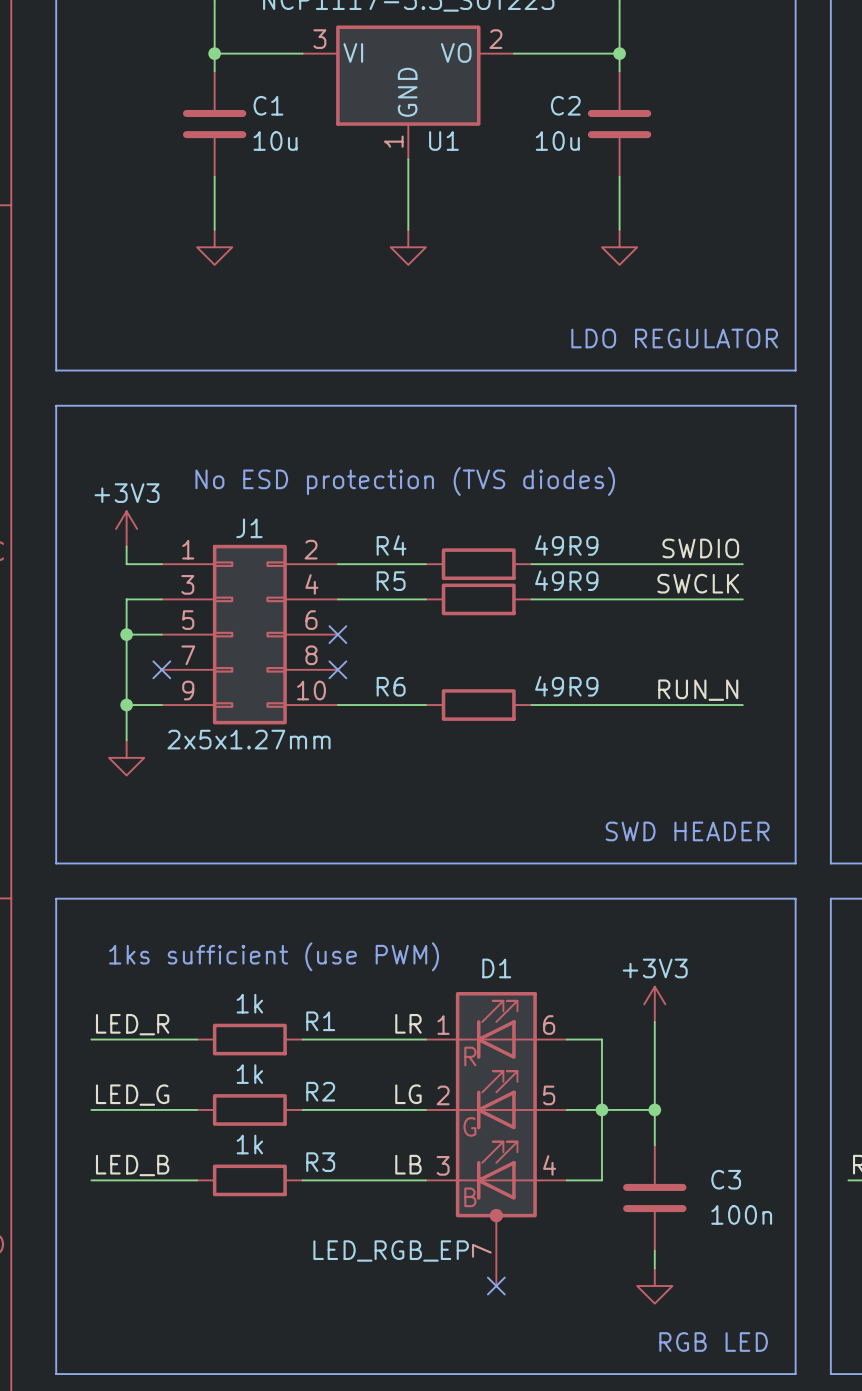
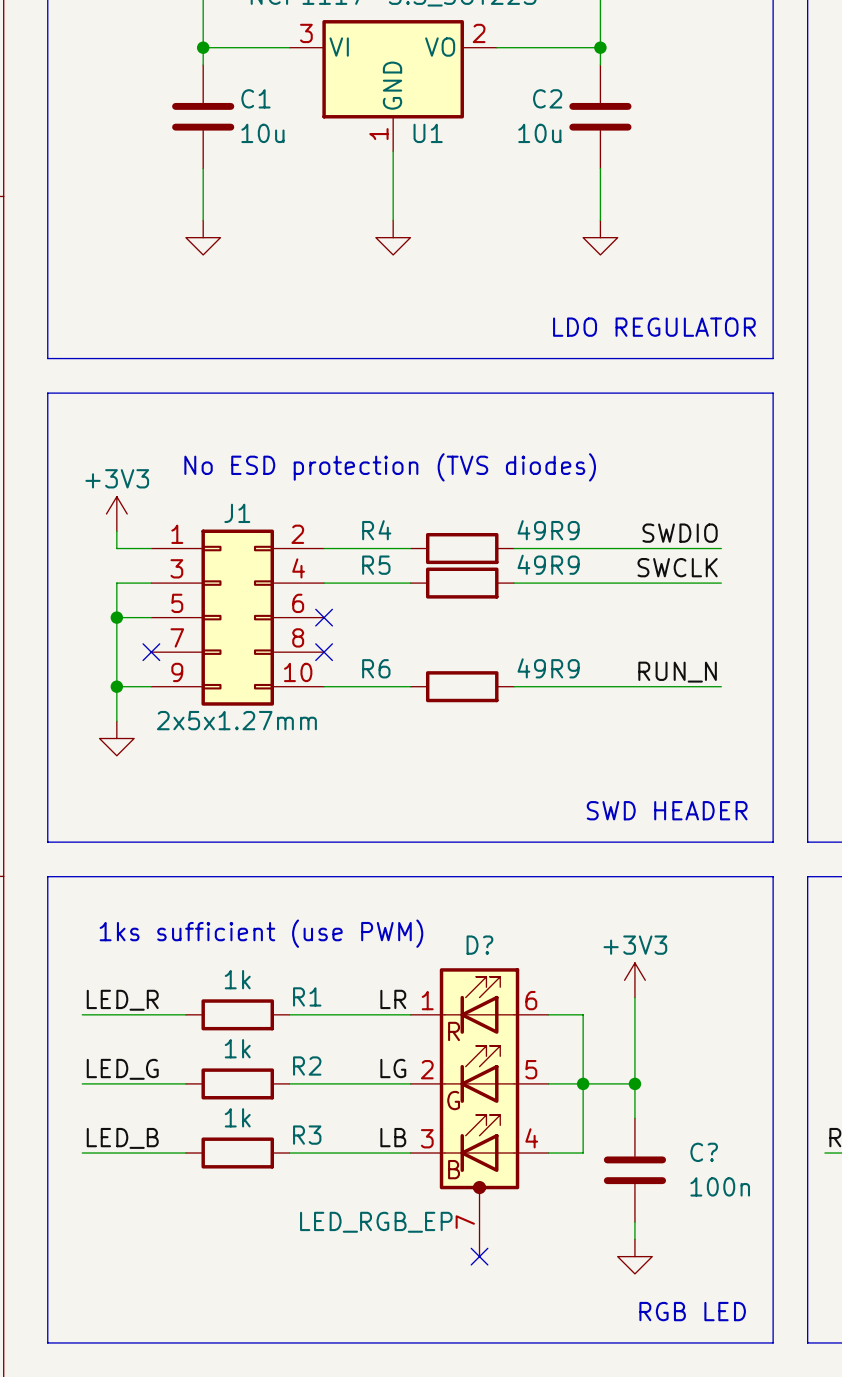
D1 name: D1 (496, 968) -> D? (479, 945)
C3 name: C3 (726, 1179) -> C? (704, 1152)

